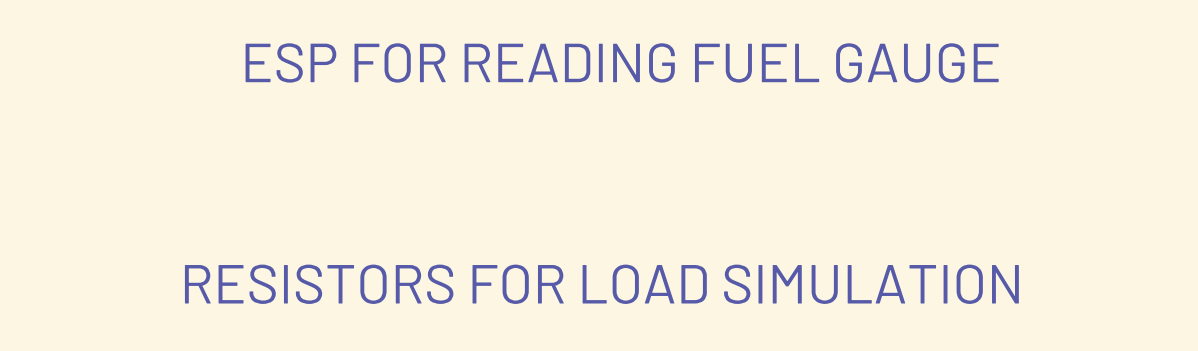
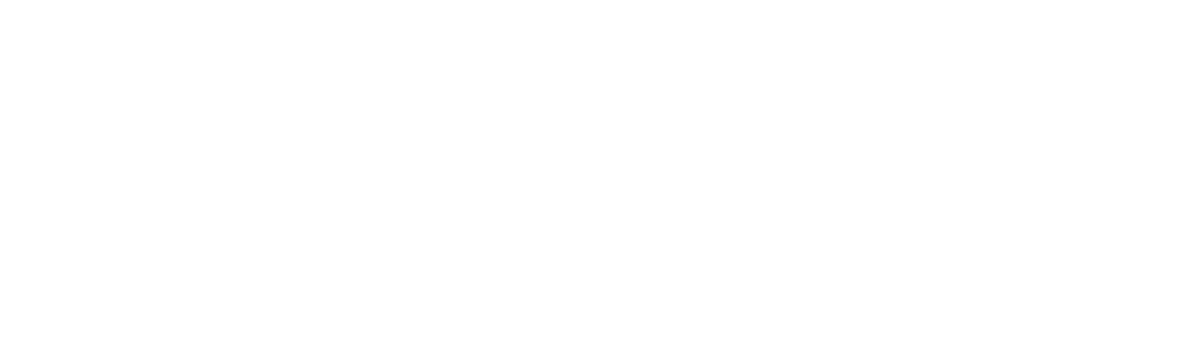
text: ESP FOR READING FUEL GAUGE (622, 62) -> none
text: RESISTORS FOR LOAD SIMULATION (601, 284) -> none

